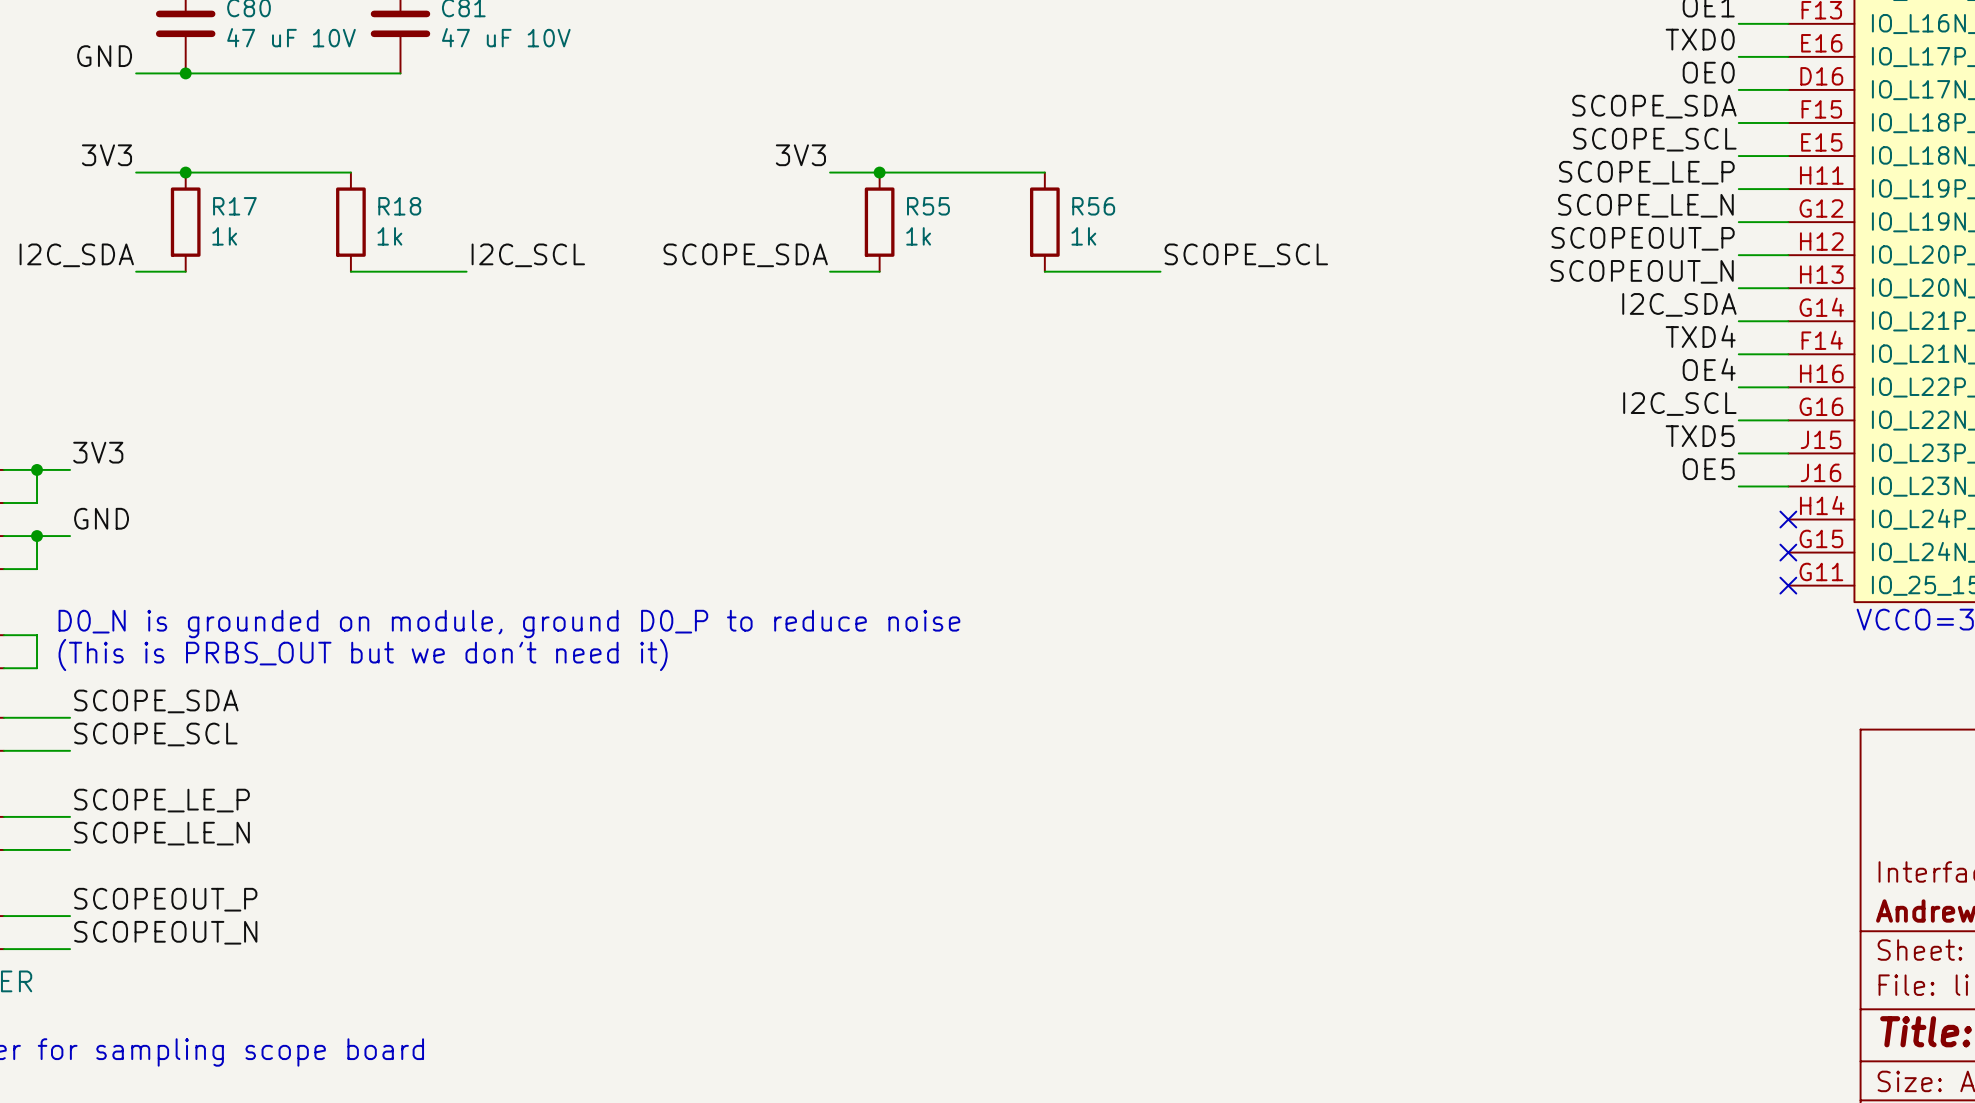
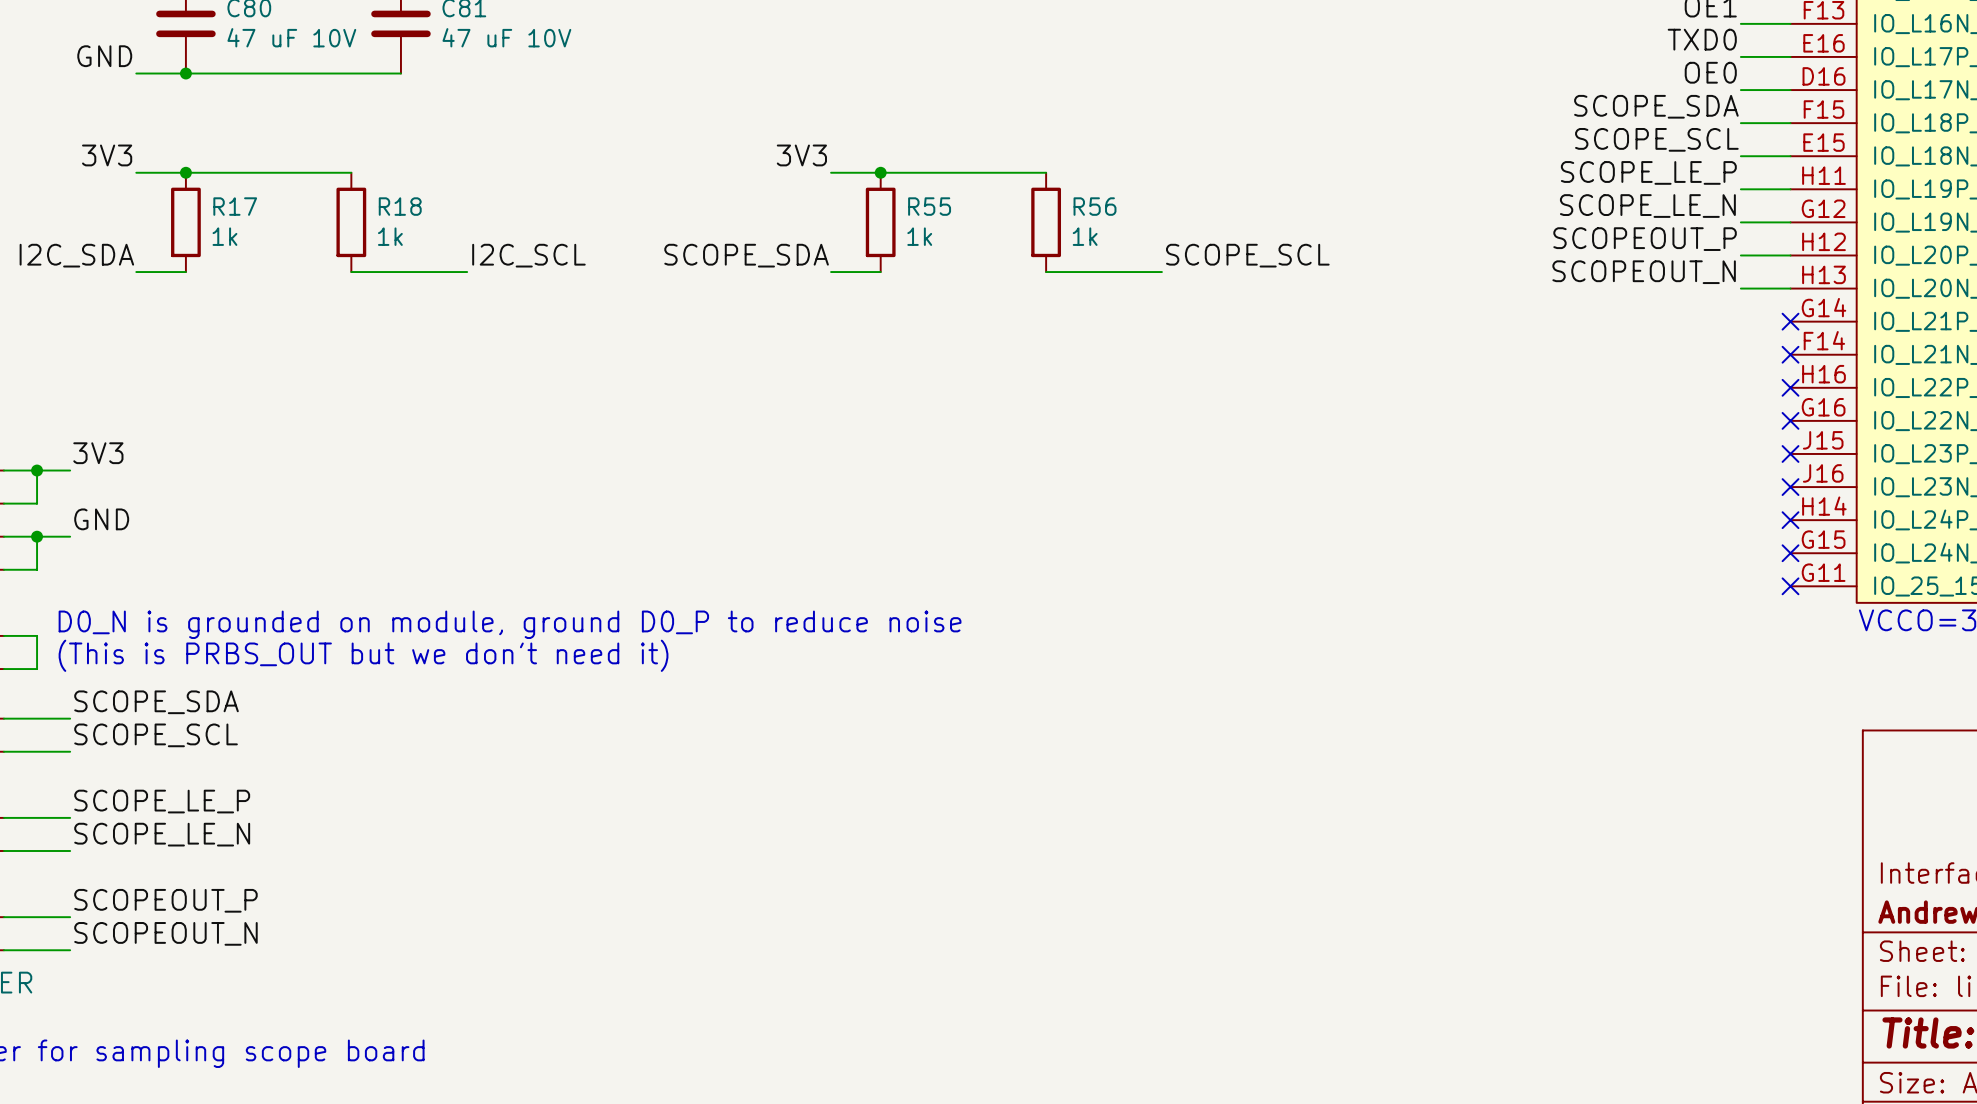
label: I2C_SDA (1679, 304) -> none
wire: (1738, 321) (1788, 321) -> none
no-connect mark: none -> (1790, 321)
label: TXD4 (1700, 336) -> none
wire: (1738, 354) (1788, 354) -> none
no-connect mark: none -> (1790, 354)
label: OE4 (1709, 369) -> none
wire: (1738, 387) (1788, 387) -> none
no-connect mark: none -> (1790, 387)
label: I2C_SCL (1679, 404) -> none
wire: (1738, 420) (1788, 420) -> none
no-connect mark: none -> (1790, 420)
label: TXD5 (1700, 436) -> none
wire: (1738, 453) (1788, 453) -> none
no-connect mark: none -> (1790, 453)
label: OE5 (1708, 469) -> none
wire: (1738, 486) (1788, 486) -> none
no-connect mark: none -> (1790, 487)

